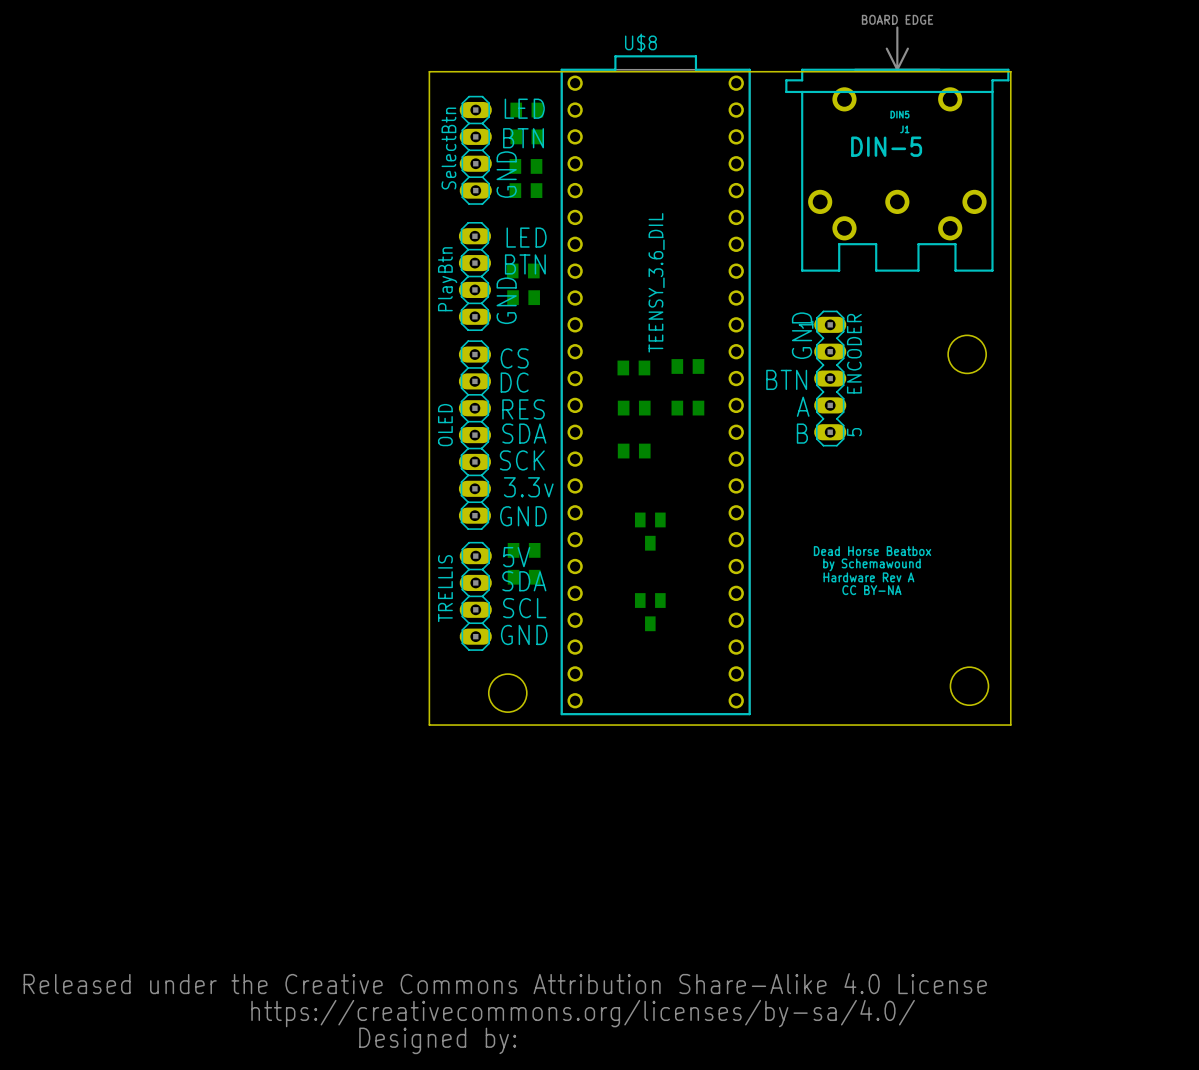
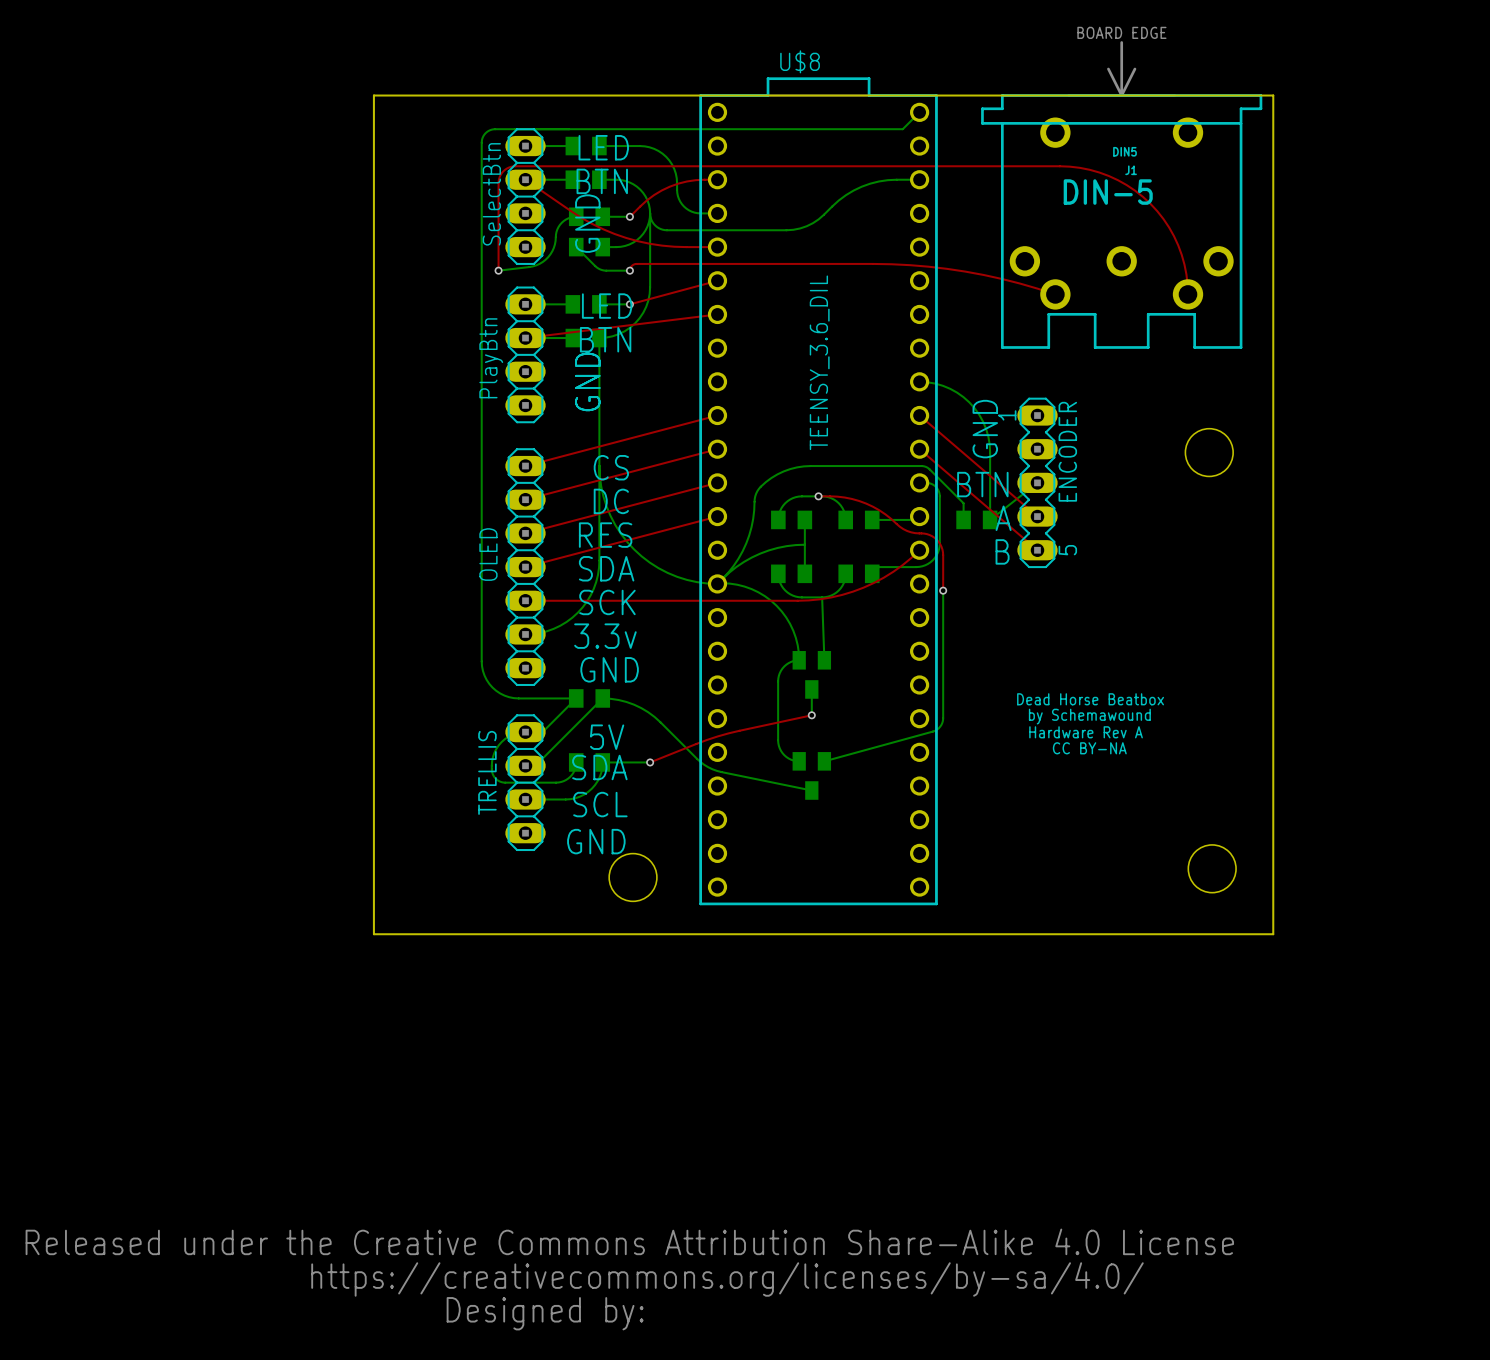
board edge: (429, 71) (1010, 71) (1010, 725) (429, 725) (429, 71) -> (373, 95) (373, 934) (1273, 934) (1273, 95) (373, 95)
bottom track: none -> (919, 112) (902, 129) (495, 129) (488, 131) (483, 135) (481, 142) (482, 666) (489, 683) (504, 695) (518, 698) (576, 698) (542, 732) (521, 732) (505, 739) (494, 752) (491, 770) (495, 778) (503, 782) (558, 782) (566, 779) (572, 774) (576, 762)
text position: LED (524, 108) -> LED (603, 147)
bottom track: none -> (525, 146) (572, 146)
part: none -> (586, 146)
bottom track: none -> (599, 146) (644, 146) (658, 151) (666, 156) (674, 168) (677, 195) (683, 206) (694, 212) (717, 213)
part: (526, 110) -> none
bottom track: none -> (525, 179) (572, 179)
top track: none -> (525, 179) (581, 217) (614, 233) (661, 245) (717, 247)
part: none -> (586, 179)
bottom track: none -> (599, 179) (620, 180) (633, 184) (645, 196) (650, 213)
part: (526, 136) -> none
top track: none -> (717, 179) (695, 180) (669, 186) (646, 200) (629, 216)
bottom track: none -> (919, 179) (887, 180) (861, 186) (838, 200) (812, 223) (793, 229) (664, 230) (655, 225) (650, 213)
text position: BTN (523, 138) -> BTN (602, 181)
part position: (475, 150) -> (525, 196)
bottom track: none -> (650, 213) (650, 287) (646, 306) (635, 323) (624, 331) (612, 336) (599, 338) (599, 560) (596, 582) (586, 601) (572, 617) (546, 631) (525, 634)
bottom track: none -> (650, 213) (645, 230) (636, 240) (625, 245) (602, 247)
bottom track: none -> (576, 216) (568, 218) (560, 224) (552, 251) (542, 261) (532, 266) (498, 270)
part: none -> (589, 216)
bottom track: none -> (602, 216) (629, 216)
via: none -> (629, 216)
part: (525, 166) -> none
text position: GND (506, 174) -> GND (587, 223)
bottom track: none -> (576, 247) (600, 269) (629, 270)
part: none -> (589, 247)
part: (525, 190) -> none
top track: none -> (498, 270) (498, 180) (503, 171) (513, 166) (1059, 166) (1079, 167) (1108, 176) (1135, 190) (1150, 203) (1169, 227) (1178, 245) (1186, 274) (1188, 294)
via: none -> (498, 270)
top track: none -> (629, 270) (631, 265) (636, 263) (910, 265) (983, 274) (1055, 294)
via: none -> (629, 270)
top track: none -> (717, 280) (629, 304)
bottom track: none -> (525, 304) (572, 304)
part: none -> (586, 304)
bottom track: none -> (599, 304) (629, 304)
via: none -> (629, 304)
text position: LED (526, 237) -> LED (607, 306)
top track: none -> (717, 314) (525, 338)
bottom track: none -> (525, 338) (572, 338)
part: none -> (586, 338)
text position: BTN (525, 264) -> BTN (605, 339)
part: (523, 270) -> none
part position: (474, 276) -> (525, 354)
part: (523, 297) -> none
bottom track: none -> (919, 381) (935, 383) (957, 392) (974, 408) (983, 421) (989, 444) (990, 519) (1037, 482)
text position: GND (506, 300) -> GND (587, 381)
top track: none -> (717, 415) (525, 466)
top track: none -> (919, 415) (1037, 516)
text position: GND (802, 335) -> GND (985, 429)
top track: none -> (717, 449) (525, 499)
top track: none -> (919, 449) (1037, 550)
text position: CS (514, 358) -> CS (611, 467)
bottom track: none -> (599, 465) (603, 496) (610, 515) (627, 541) (641, 556) (658, 568) (686, 579) (717, 583) (722, 578)
part: (687, 366) -> none
part: (633, 367) -> none
top track: none -> (717, 482) (525, 533)
bottom track: none -> (919, 482) (933, 484) (939, 492) (939, 543) (936, 555) (930, 562) (922, 566) (878, 567) (873, 569) (872, 573)
text position: DC (514, 382) -> DC (611, 501)
top track: none -> (818, 496) (837, 496) (859, 500) (879, 510) (907, 530) (927, 534) (934, 537) (940, 544) (942, 552) (943, 590)
via: none -> (818, 496)
top track: none -> (717, 516) (525, 567)
bottom track: none -> (919, 516) (916, 519) (872, 519)
bottom track: none -> (778, 519) (780, 510) (785, 503) (792, 498) (801, 496) (825, 496) (833, 499) (842, 508) (845, 519)
bottom track: none -> (804, 519) (804, 573)
bottom track: none -> (963, 519) (963, 503) (924, 466) (797, 467) (771, 477) (757, 491) (751, 527) (746, 543) (733, 565) (722, 578)
part: none -> (976, 519)
text position: RES (523, 409) -> RES (605, 535)
bottom track: none -> (804, 544) (777, 547) (760, 553) (744, 561) (722, 578)
top track: none -> (919, 550) (902, 565) (873, 582) (842, 594) (820, 599) (525, 600)
text position: SDA (524, 433) -> SDA (606, 568)
part position: (474, 435) -> (525, 567)
bottom track: none -> (778, 573) (781, 585) (790, 594) (798, 597) (822, 597)
bottom track: none -> (845, 573) (843, 582) (838, 590) (831, 595) (822, 597)
part: none -> (858, 573)
bottom track: none -> (718, 583) (744, 586) (764, 596) (781, 611) (793, 630) (799, 660) (786, 664) (778, 675) (778, 740) (779, 748) (784, 755) (791, 759) (799, 761)
text position: SCK (522, 460) -> SCK (607, 602)
bottom track: none -> (943, 590) (943, 718) (940, 726) (932, 731) (824, 761)
via: none -> (943, 590)
bottom track: none -> (822, 597) (824, 660)
text position: 3.3v (528, 487) -> 3.3v (605, 636)
text position: GND (523, 516) -> GND (609, 669)
bottom track: none -> (811, 689) (811, 715)
part: none -> (589, 698)
part: (524, 550) -> none
text position: 5V (516, 557) -> 5V (607, 737)
top track: none -> (811, 715) (717, 736) (650, 762)
via: none -> (811, 715)
part: (524, 577) -> none
text position: SDA (524, 581) -> SDA (599, 767)
TRELLIS position: (475, 596) -> (525, 782)
part: none -> (589, 762)
bottom track: none -> (650, 762) (602, 762) (597, 780) (591, 788) (579, 796) (565, 799) (525, 799)
via: none -> (650, 762)
bottom track: none -> (525, 765) (535, 765) (602, 698) (610, 698) (634, 704) (648, 712) (700, 762) (712, 769) (811, 790)
text position: SCL (524, 608) -> SCL (600, 804)
text position: GND (524, 634) -> GND (596, 841)

